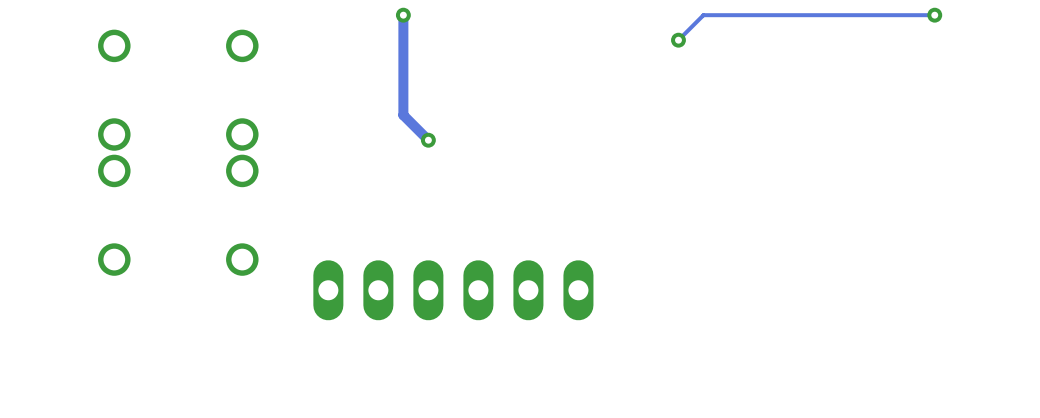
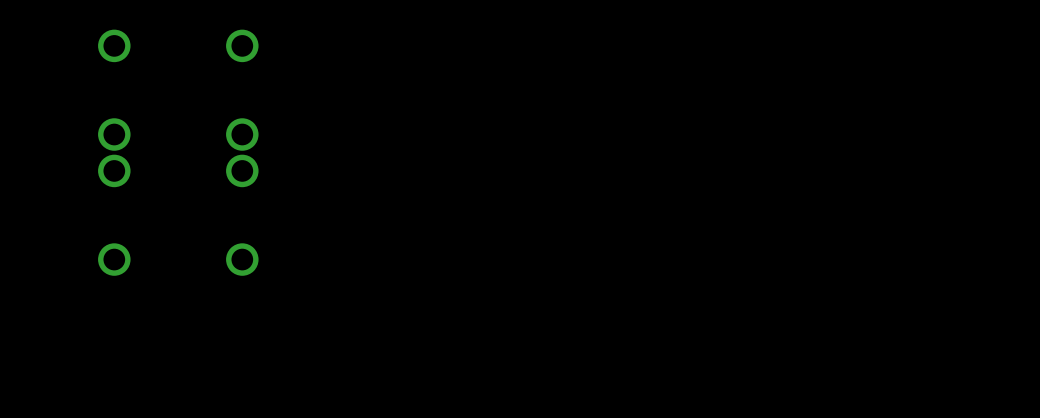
track: (403, 15) (403, 115) (428, 140) -> none
via: (403, 15) -> none
track: (934, 15) (703, 15) (678, 40) -> none
via: (934, 15) -> none
via: (678, 40) -> none
via: (428, 140) -> none
part: (453, 290) -> none

